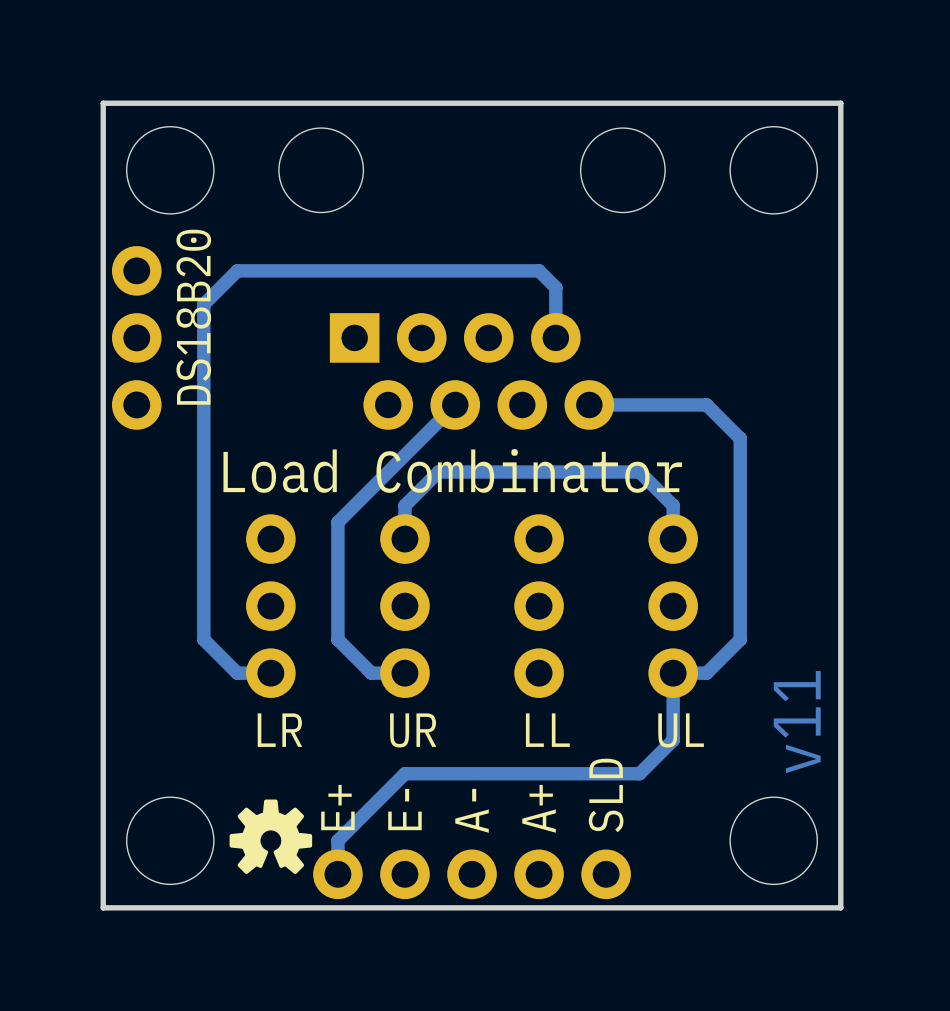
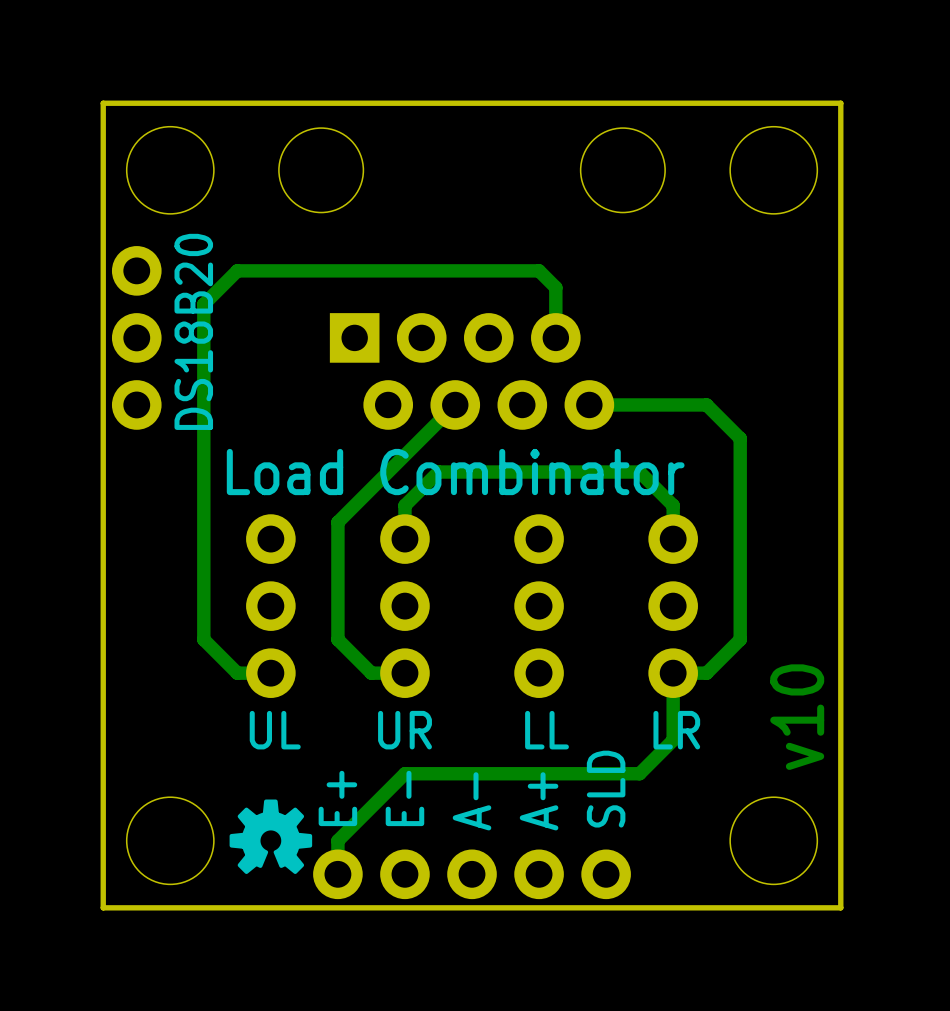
text: v11 (797, 722) -> v10 (797, 717)
text: LR (279, 730) -> UL (275, 730)
text: UL (681, 730) -> LR (676, 730)

